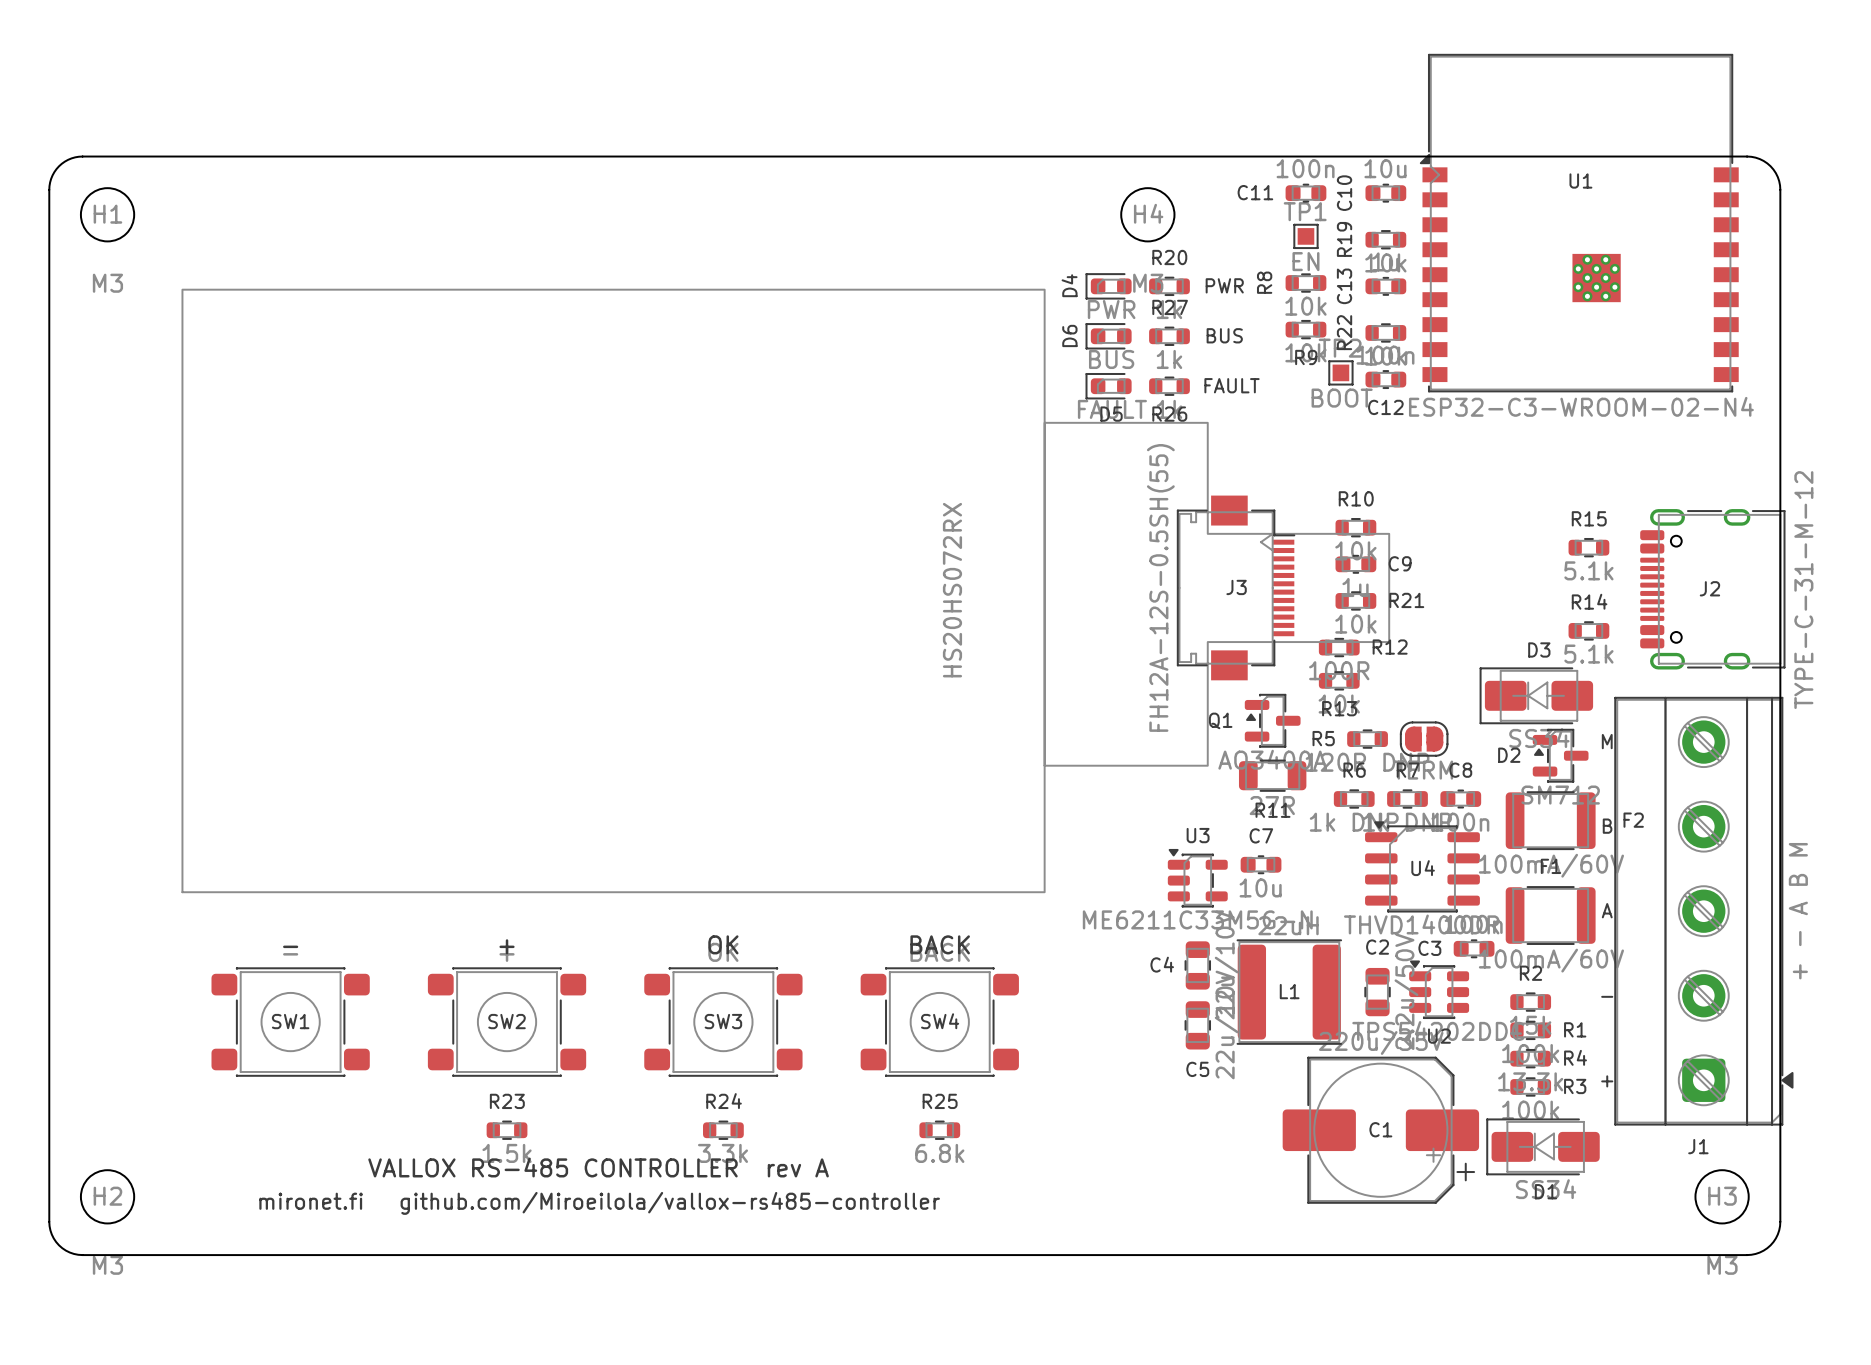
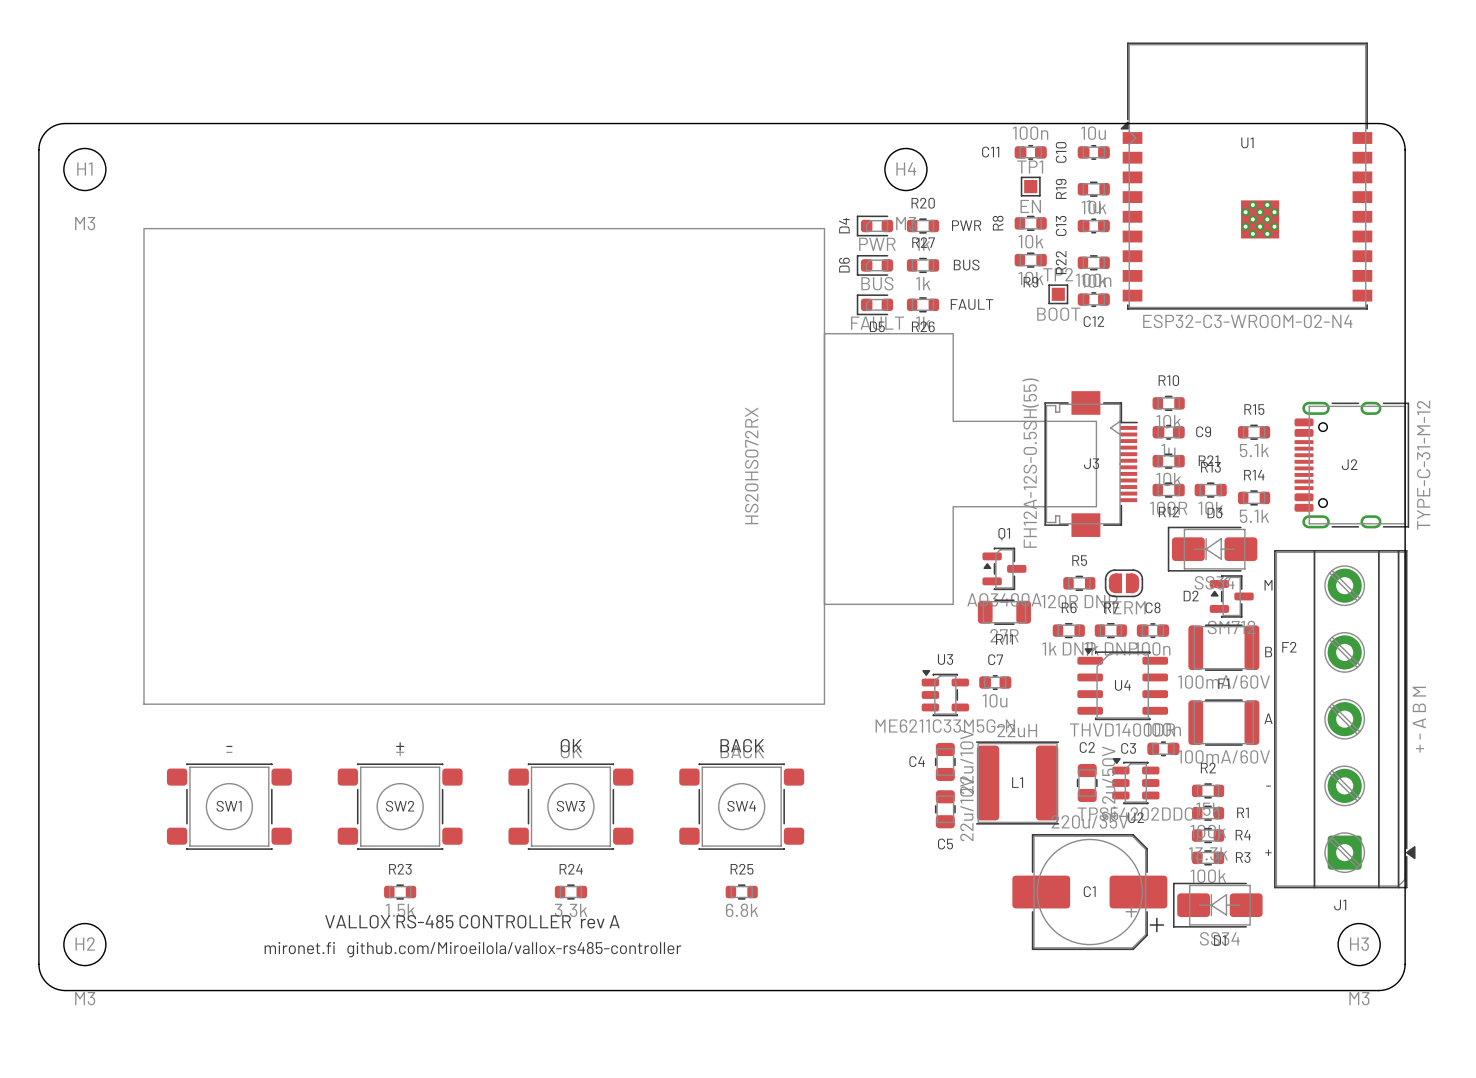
R10 position: (1355, 527) -> (1168, 403)
C9 position: (1355, 564) -> (1168, 432)
J3 position: (1236, 587) -> (1091, 464)
R21 position: (1355, 600) -> (1168, 461)
R12 position: (1339, 647) -> (1168, 490)
R12 name position: R12 (1390, 647) -> R12 (1168, 511)
R13 position: (1339, 680) -> (1210, 490)
R13 name position: R13 (1339, 708) -> R13 (1210, 467)
Q1 name position: Q1 (1220, 720) -> Q1 (1004, 534)
R5 name position: R5 (1323, 738) -> R5 (1079, 560)

